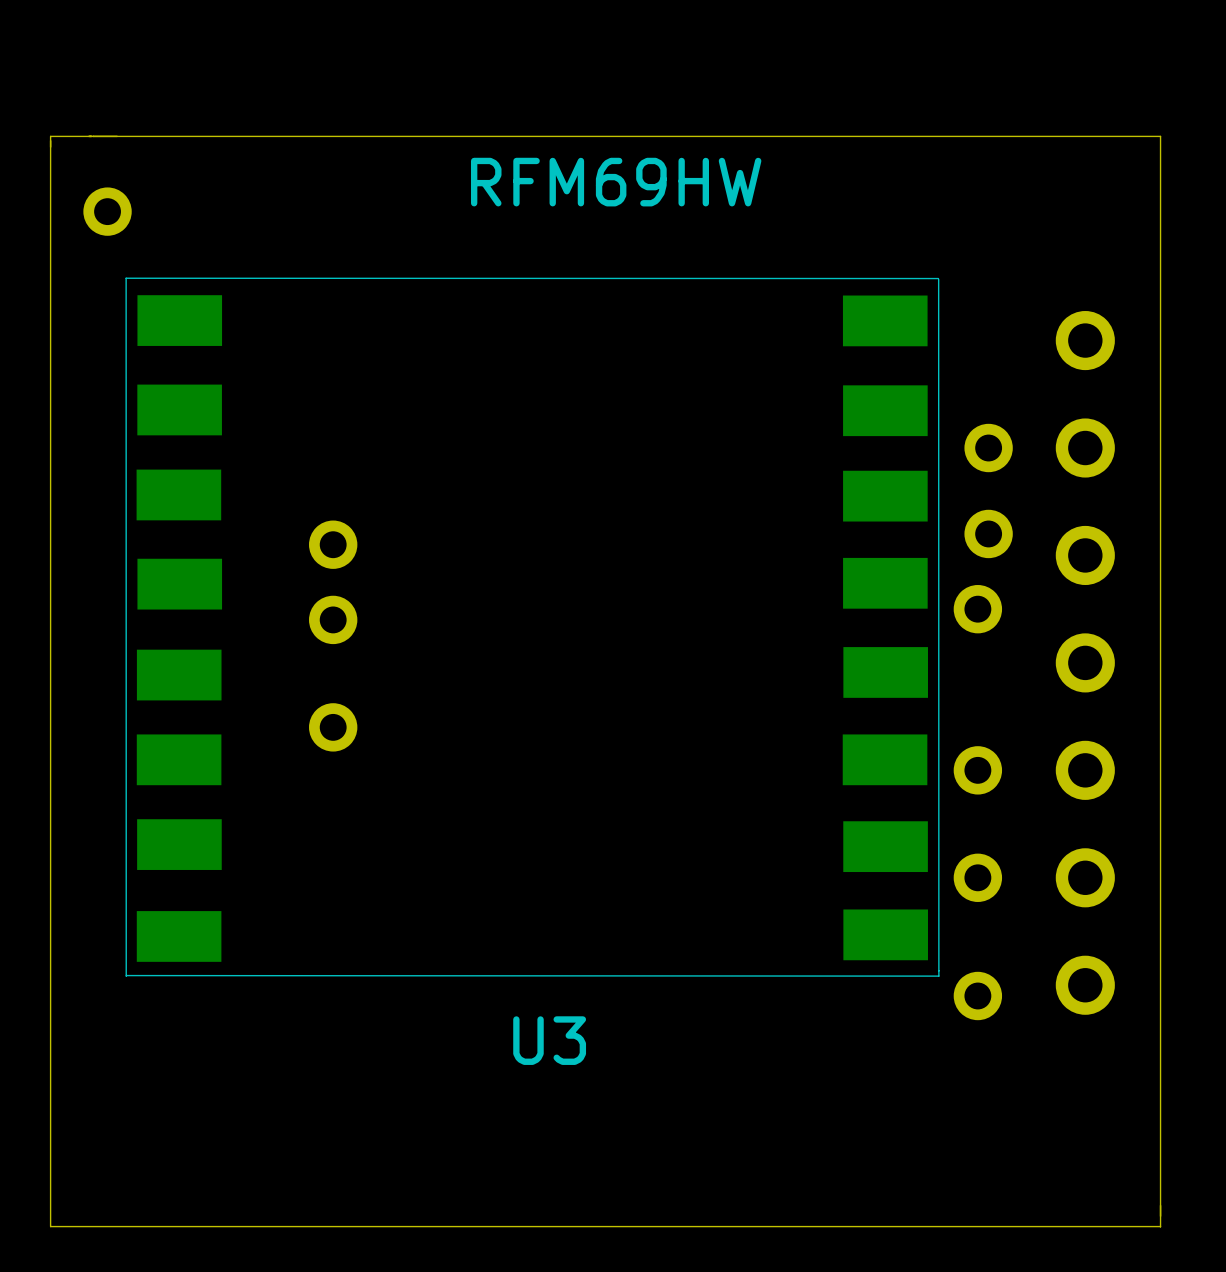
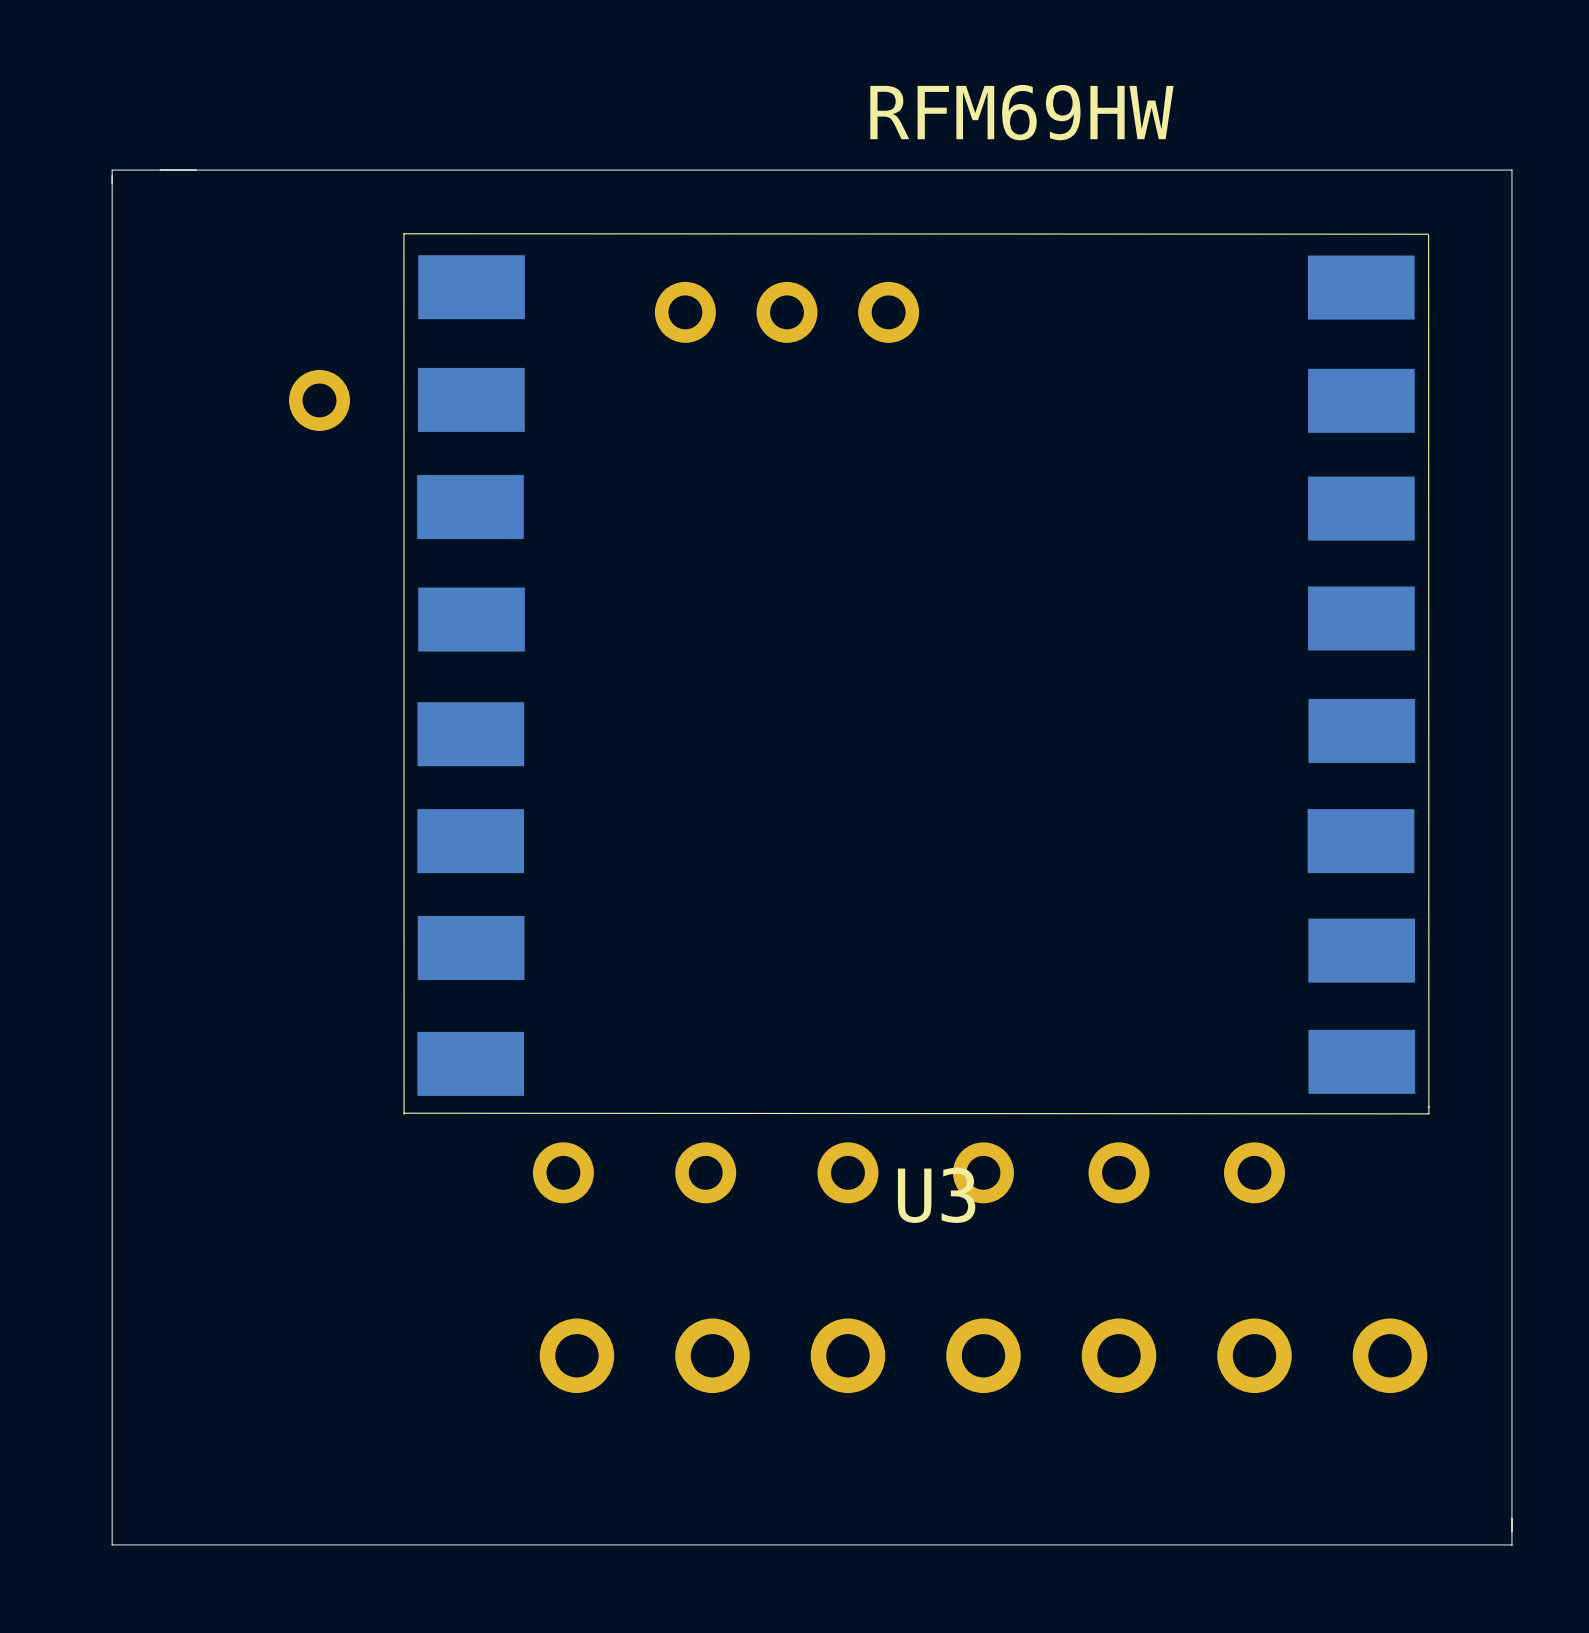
part: (107, 211) -> none
part: none -> (685, 312)
part: none -> (787, 312)
part: none -> (888, 312)
part: none -> (319, 400)
part: (988, 448) -> none
part: (988, 533) -> none
part: (333, 544) -> none
part: (977, 609) -> none
part: (333, 619) -> none
U3 position: (532, 627) -> (916, 673)
part rotation: 0° (1085, 662) -> 90° clockwise (983, 1355)
part position: (1085, 662) -> (983, 1355)
part: (333, 727) -> none
part: (977, 770) -> none
part: (977, 877) -> none
part: none -> (563, 1172)
part: none -> (705, 1172)
part: none -> (847, 1172)
part: none -> (983, 1172)
part: none -> (1118, 1172)
part: none -> (1254, 1172)
part: (977, 995) -> none

